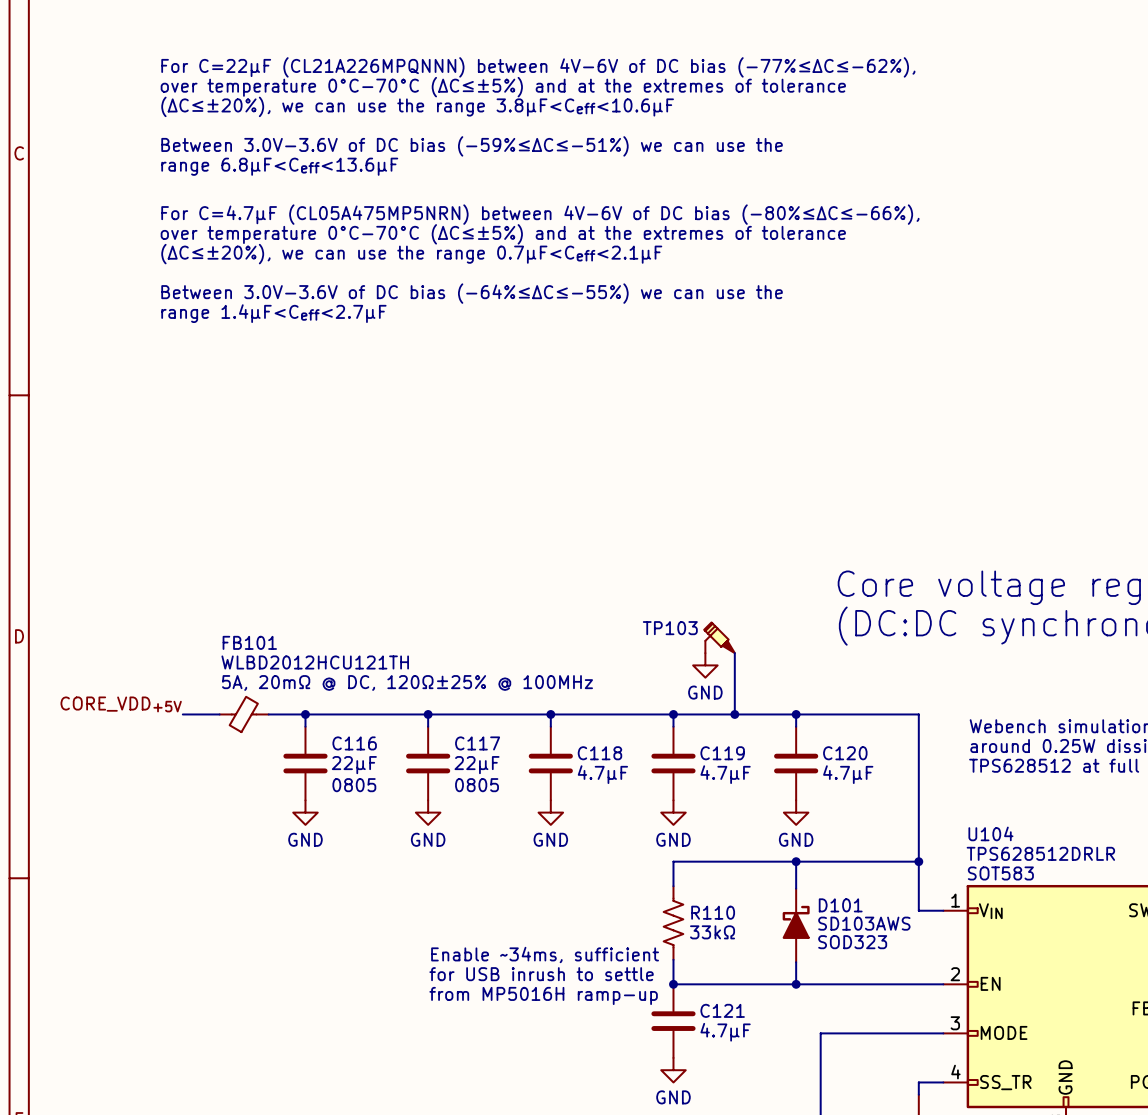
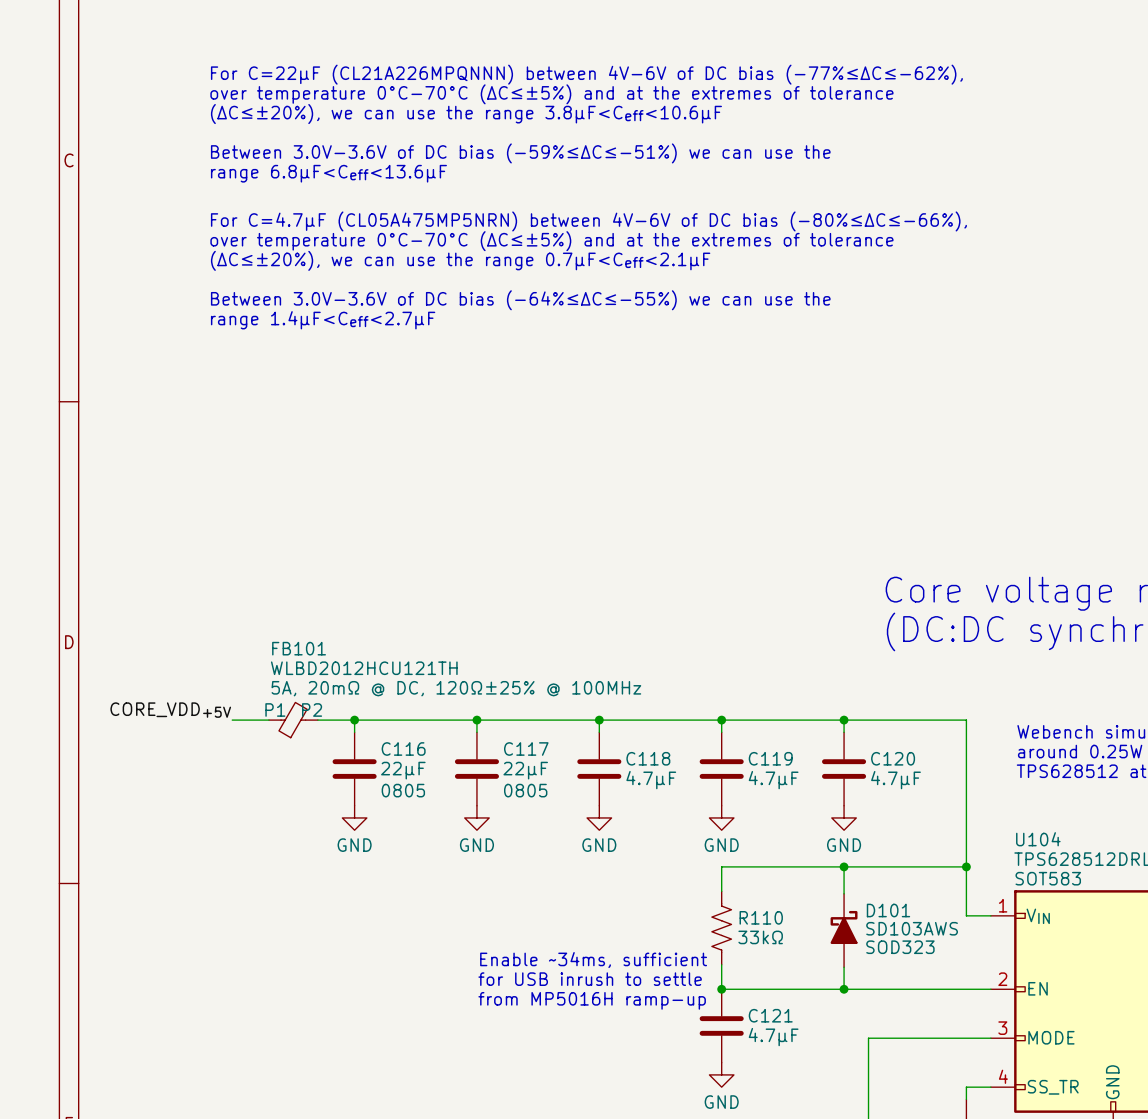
TP103: (719, 637) -> none
wire: (734, 653) (734, 714) -> none
power symbol: GND (705, 665) -> none
FB101 pin name: none -> P1 (275, 709)
FB101 pin name: none -> P2 (312, 709)
junction: (734, 714) -> none

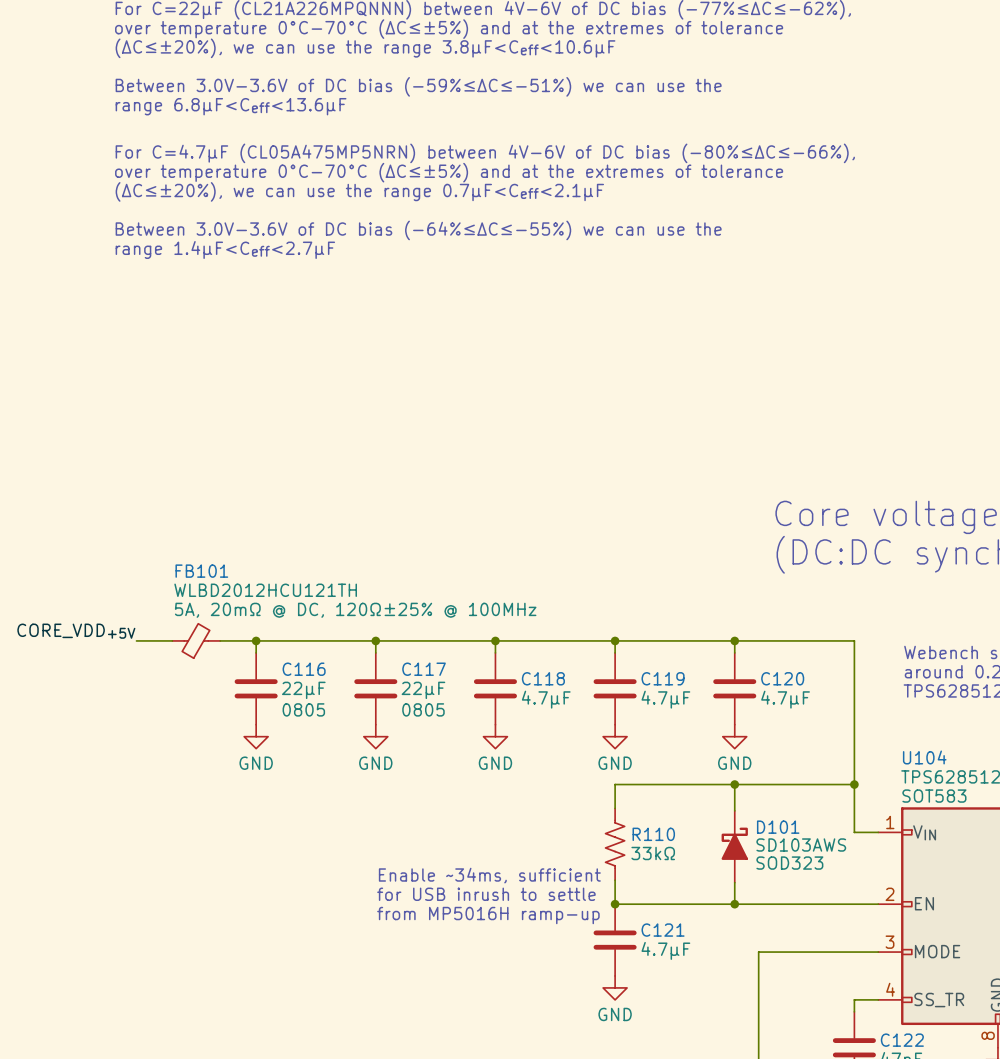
FB101 pin name: P1 (275, 709) -> none
FB101 pin name: P2 (312, 709) -> none

